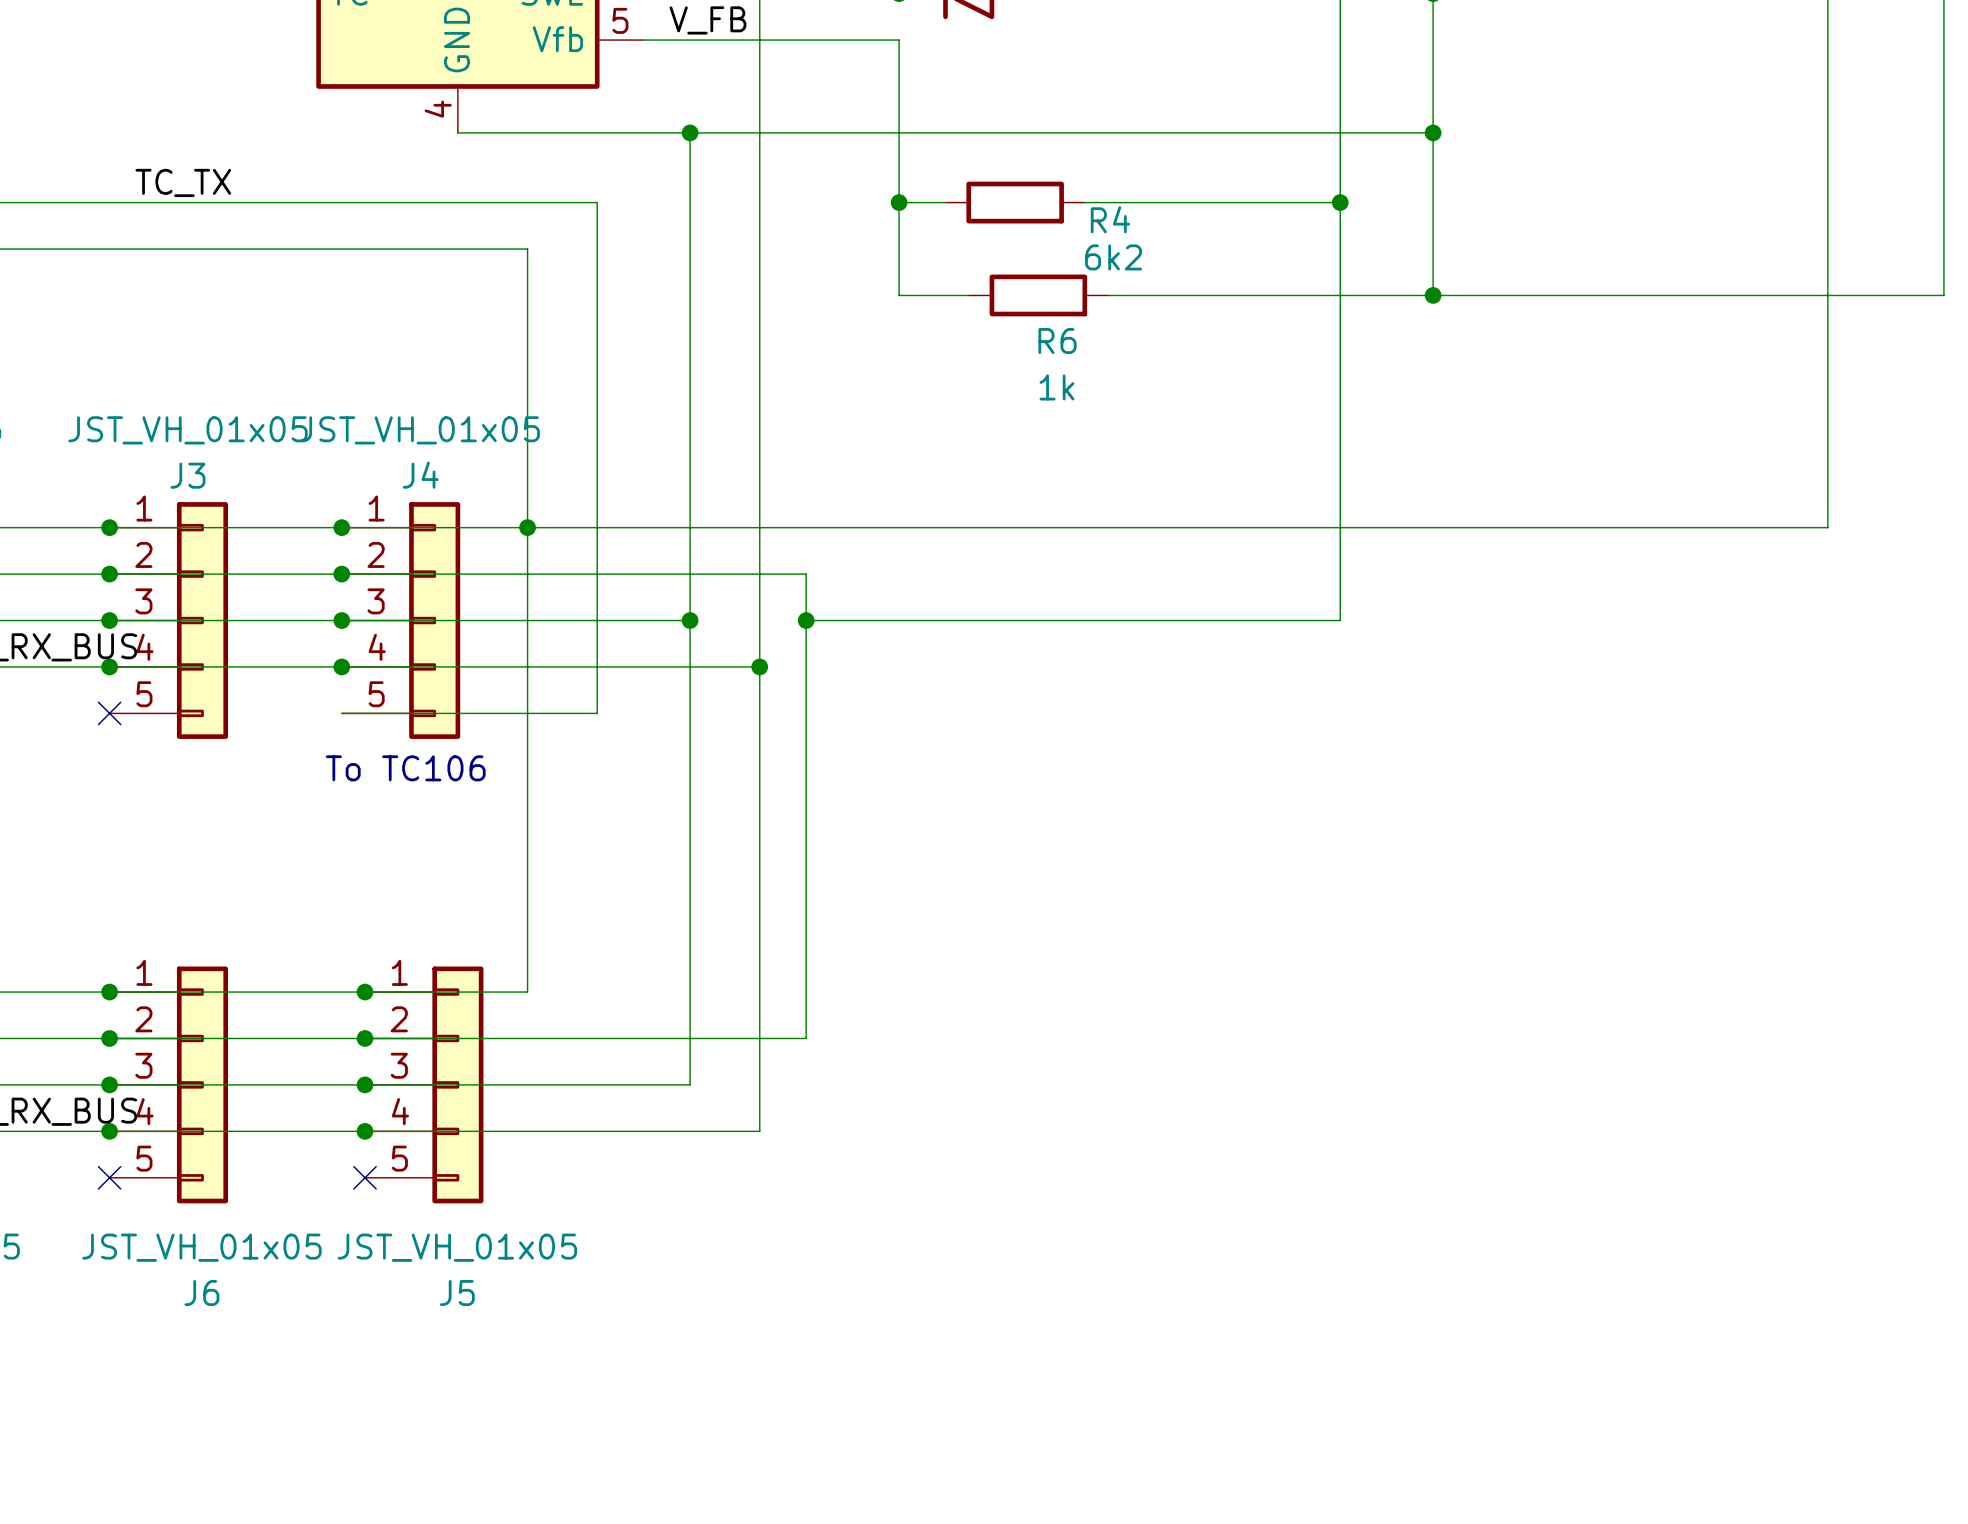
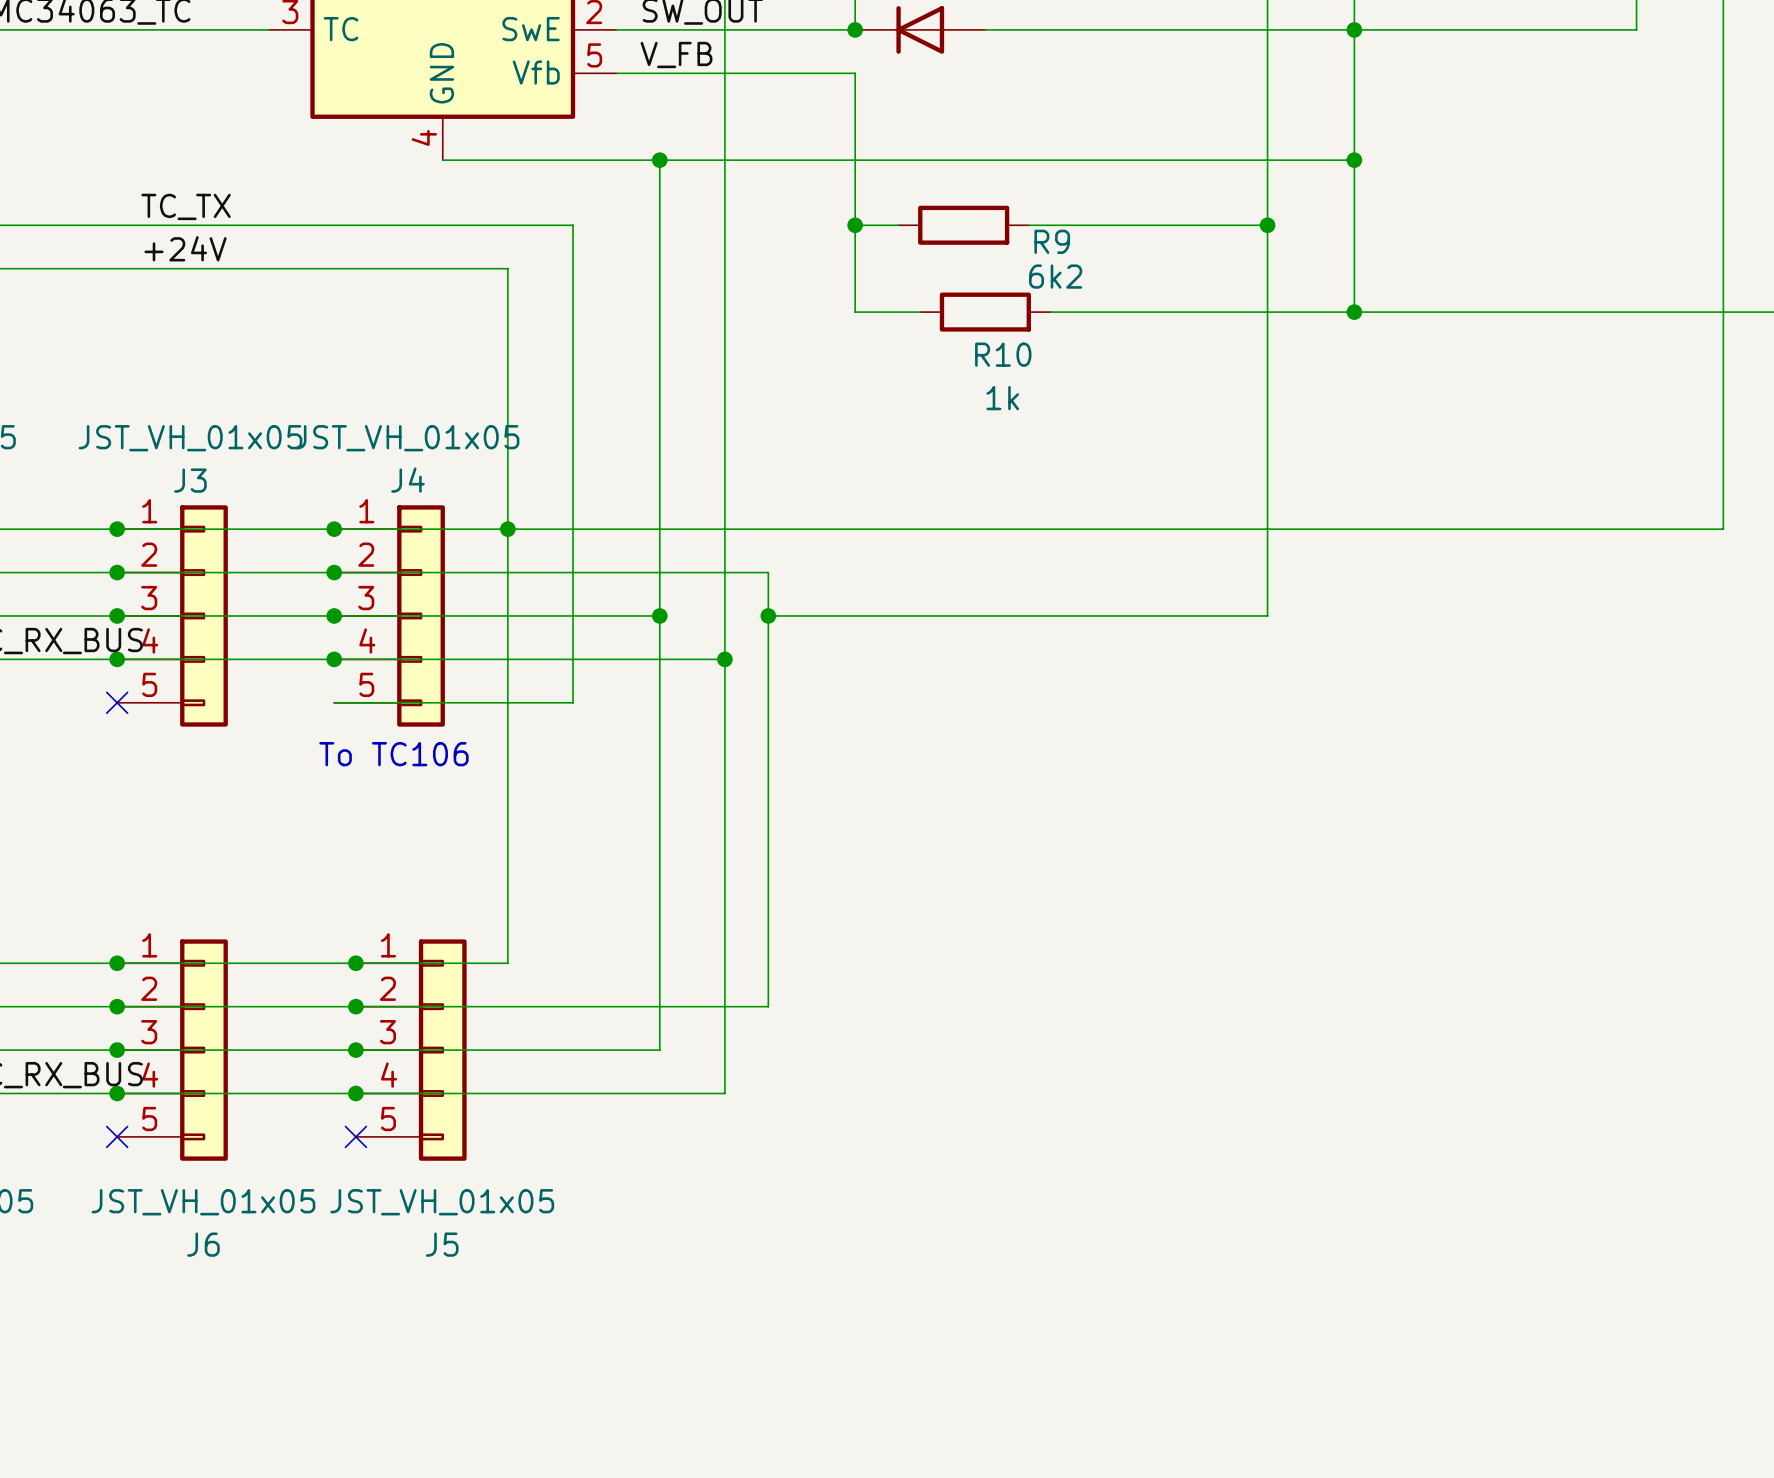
R4 name: R4 (1110, 219) -> R9 (1052, 241)
label: none -> +24V (185, 248)
R6 name: R6 (1057, 341) -> R10 (1003, 354)

